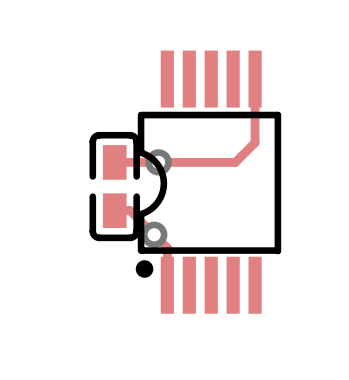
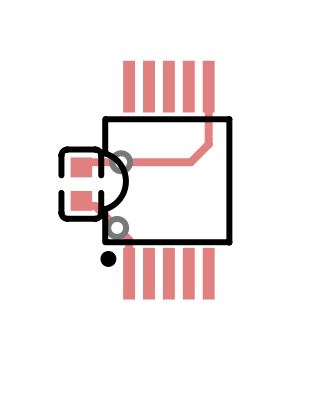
part footprint: [89, 131, 140, 242] -> [58, 146, 105, 222]

